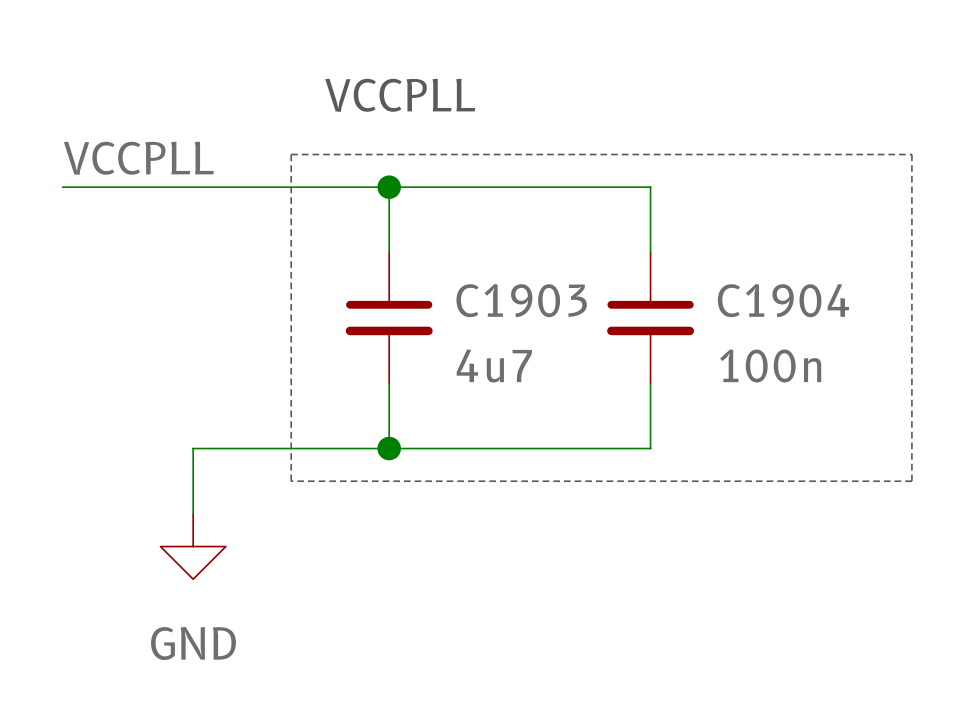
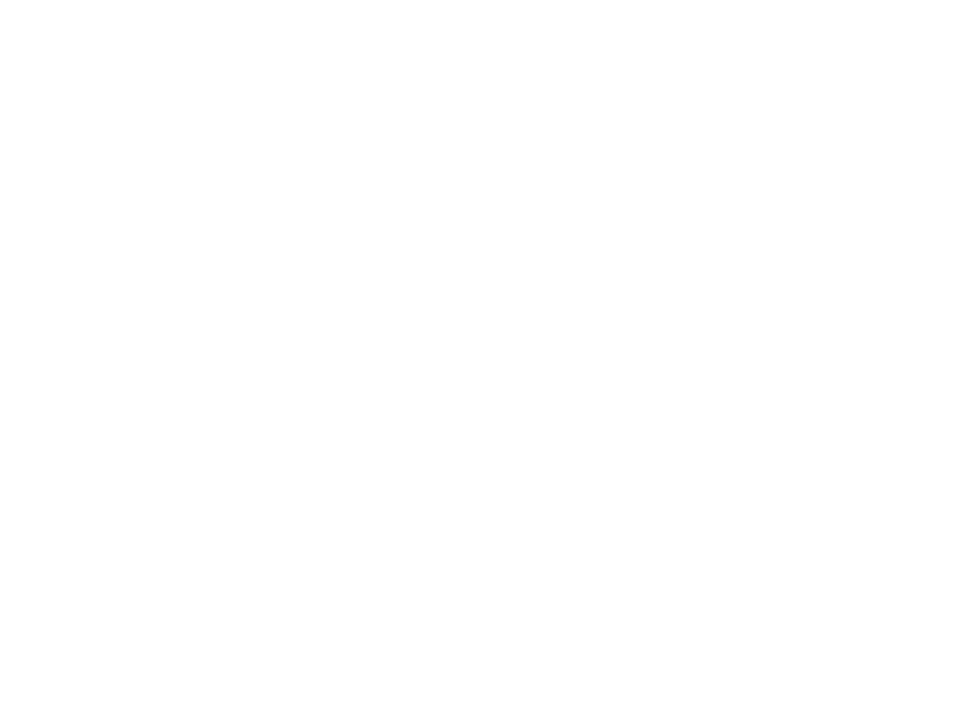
text: VCCPLL (400, 95) -> none
line: (291, 154) (911, 154) (911, 481) (291, 481) (291, 154) -> none
label: VCCPLL (138, 158) -> none
wire: (62, 187) (650, 187) (650, 252) -> none
wire: (389, 187) (389, 252) -> none
junction: (389, 187) -> none
C1903: 4u7 (389, 317) -> none
C1904: 100n (650, 317) -> none
wire: (389, 383) (389, 448) -> none
wire: (650, 383) (650, 448) (193, 448) (193, 513) -> none
junction: (389, 448) -> none
power symbol: GND (193, 546) -> none

